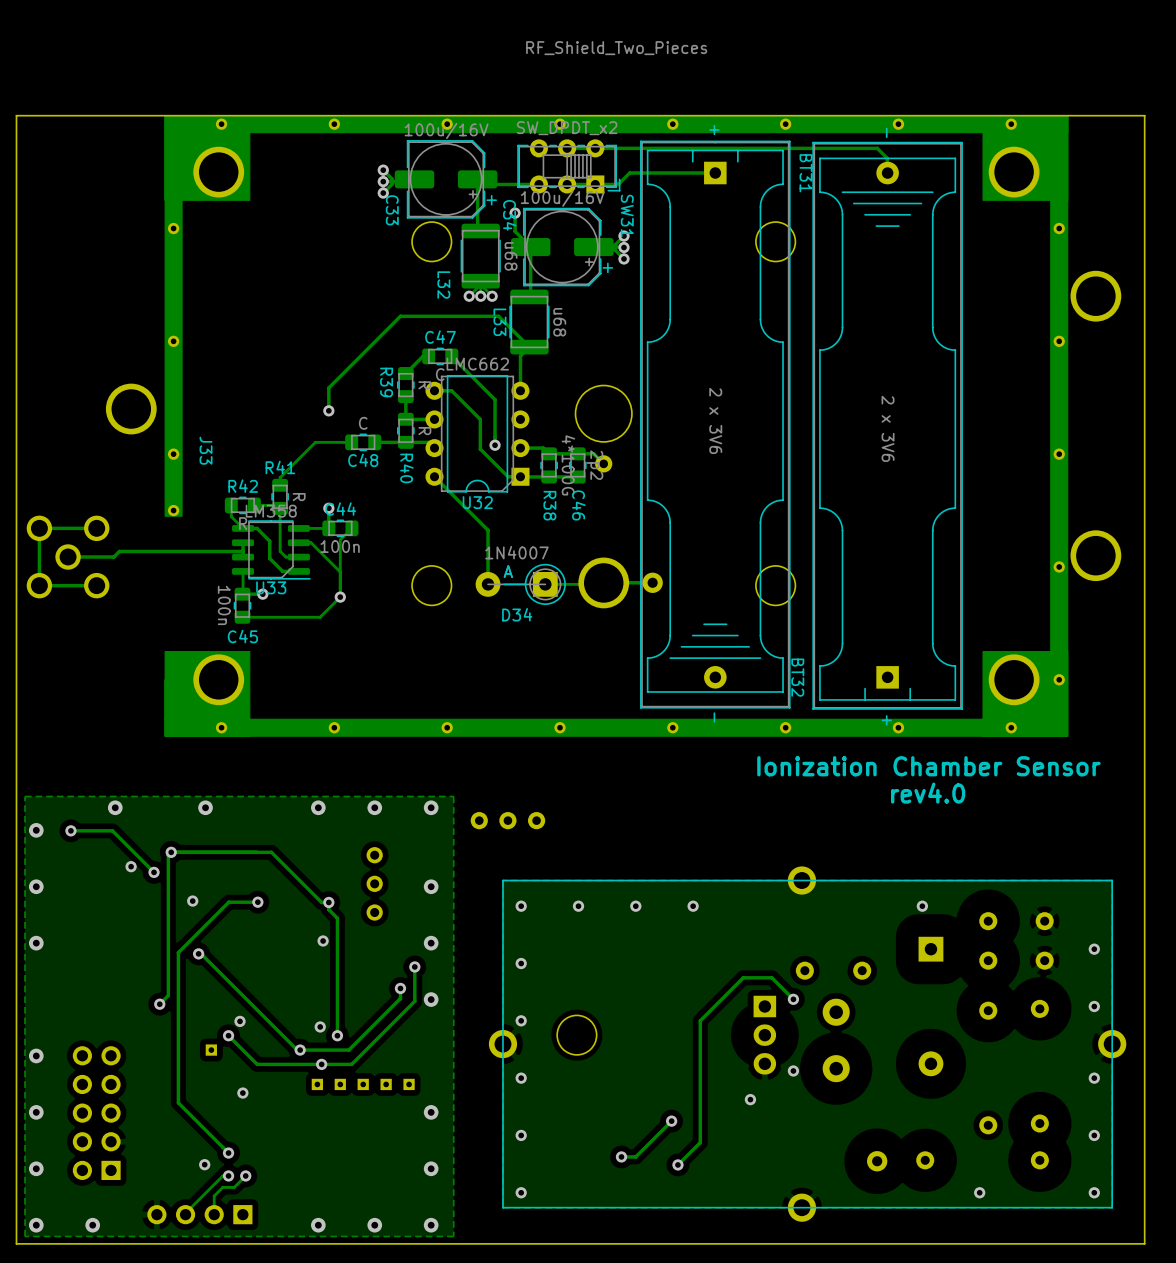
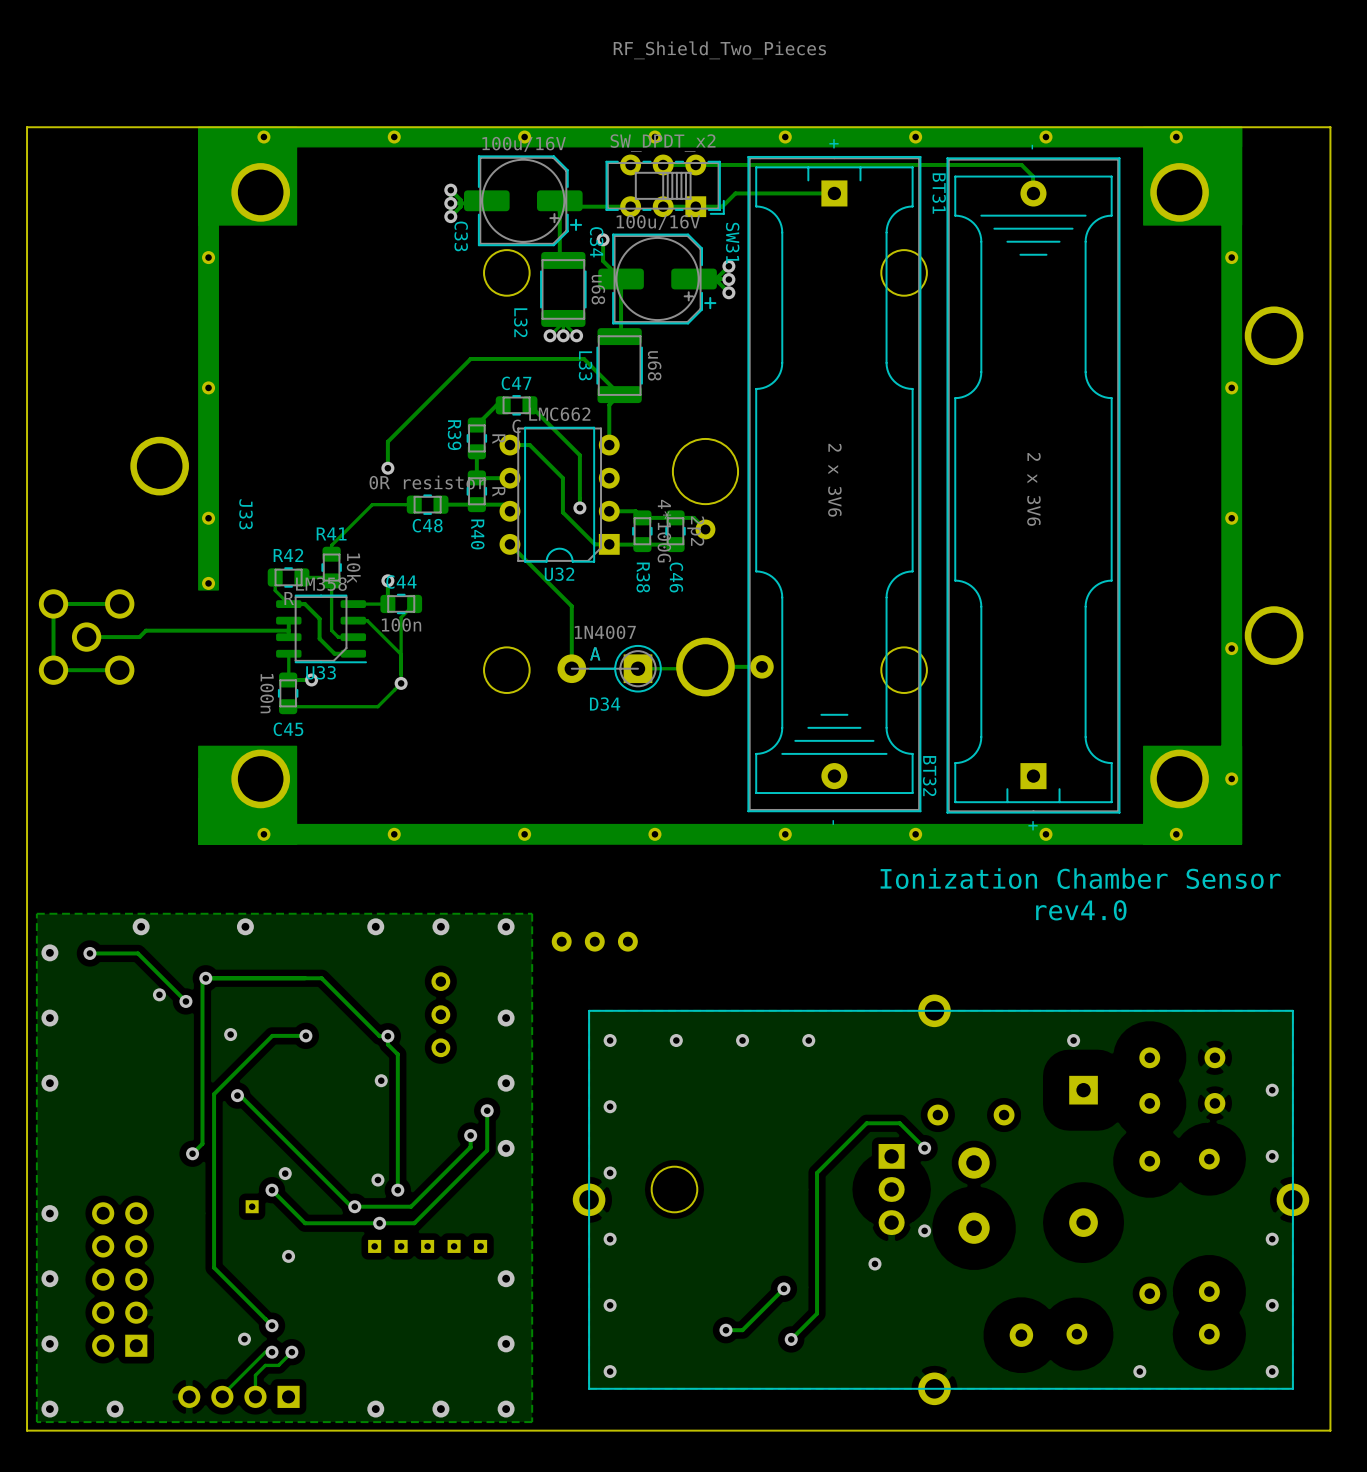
C48 value: C (363, 423) -> 0R resistor (427, 482)
R41 value: R (299, 497) -> 10k (353, 568)

